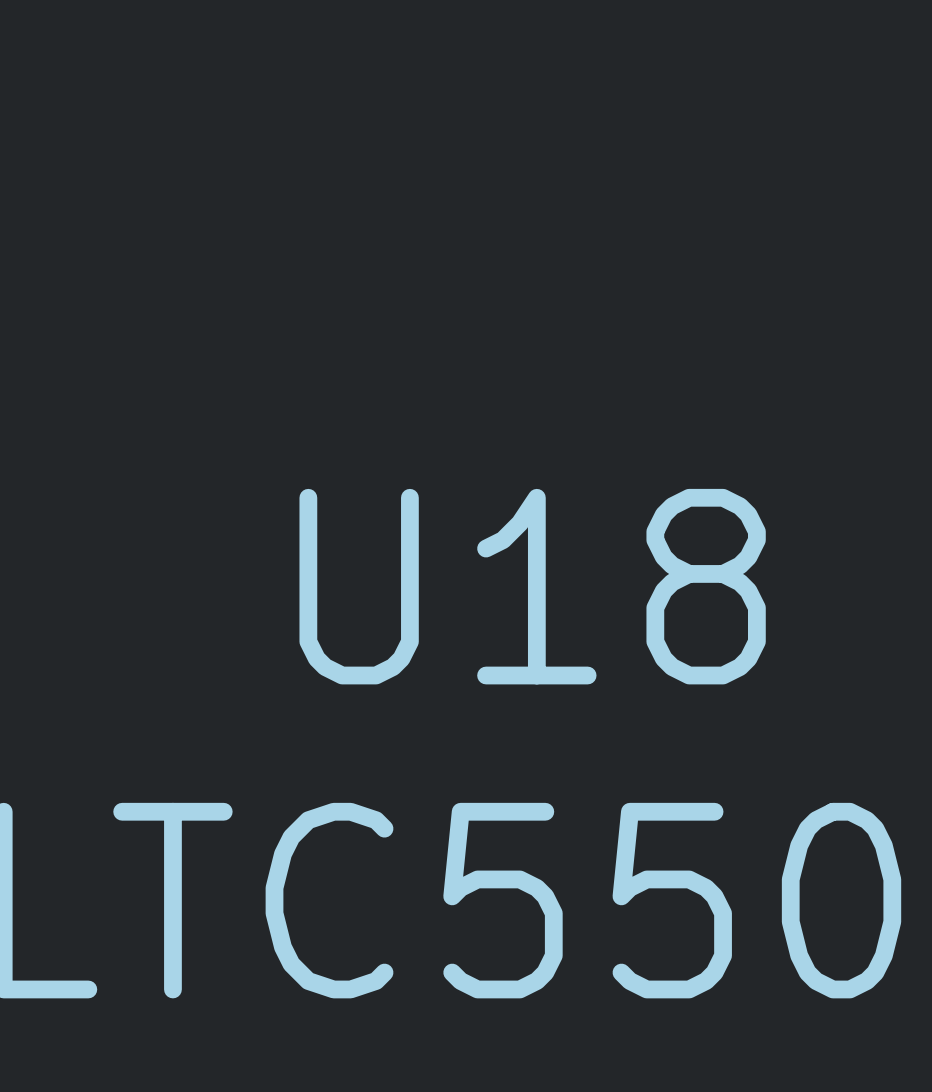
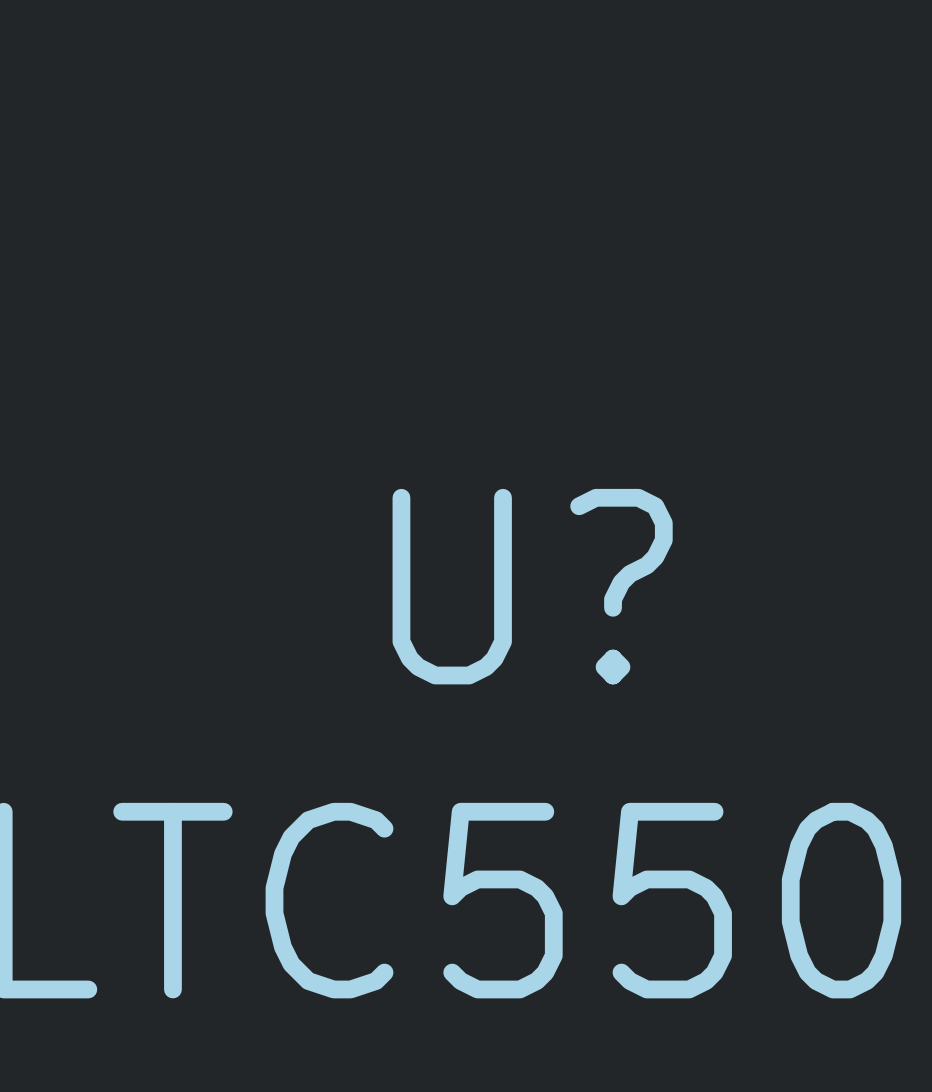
U18 name: U18 (532, 586) -> U? (532, 586)

